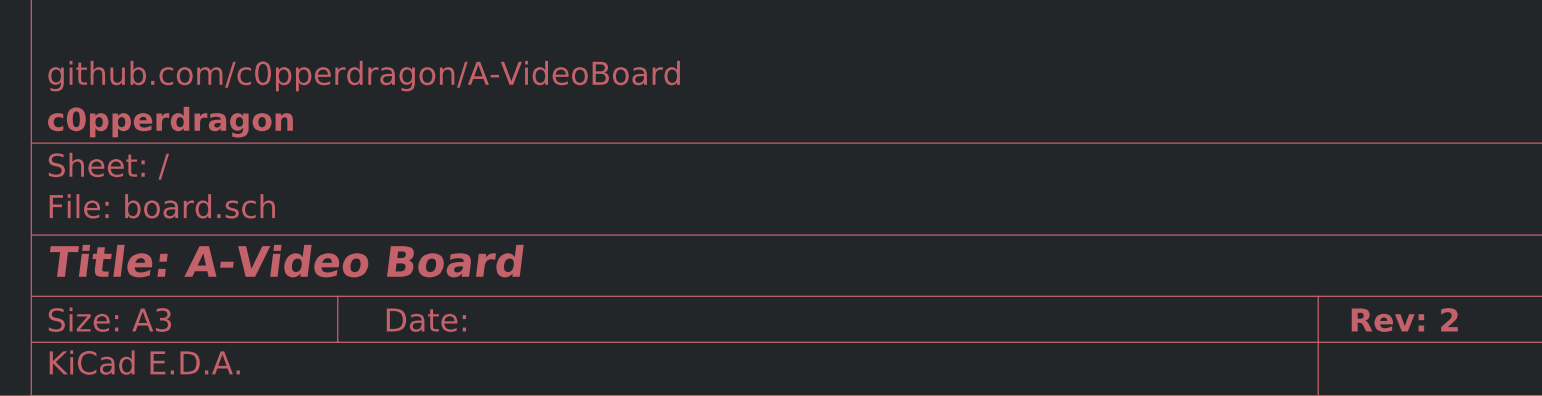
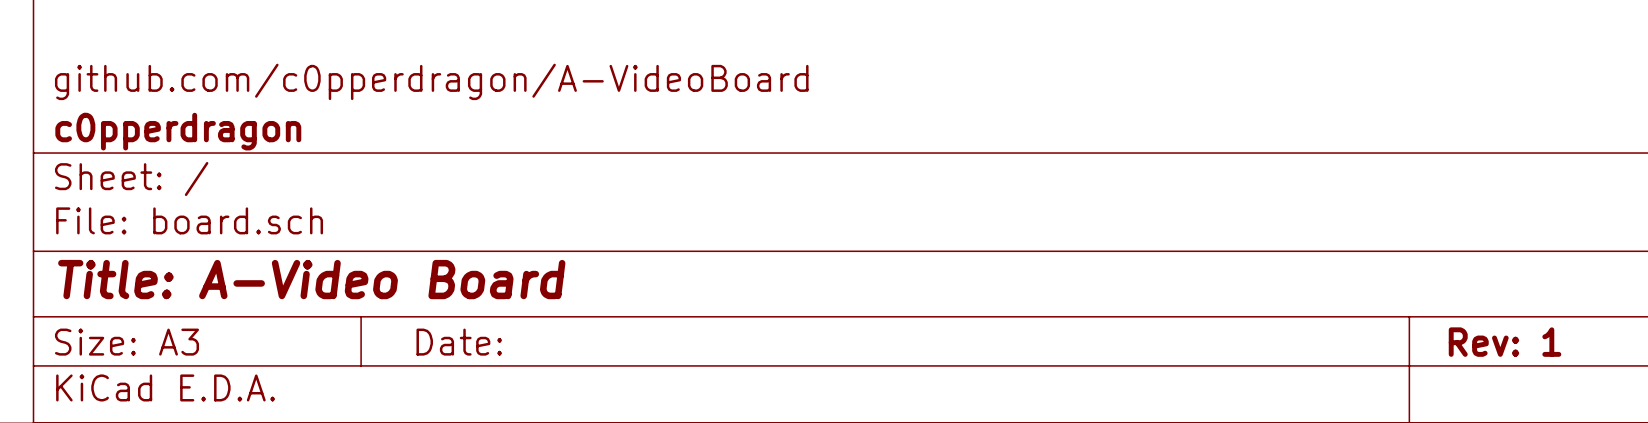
title block: Rev: 2 (1404, 319) -> Rev: 1 (1505, 342)

